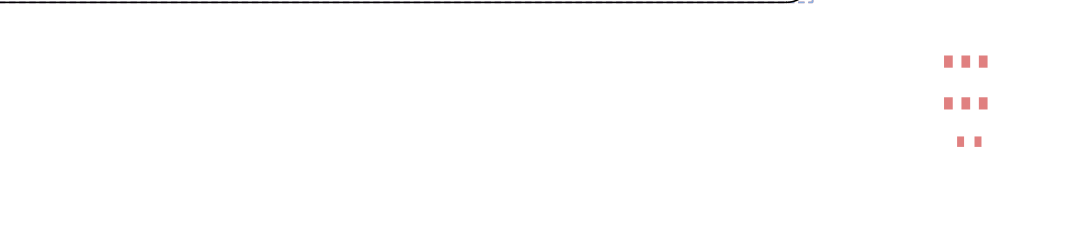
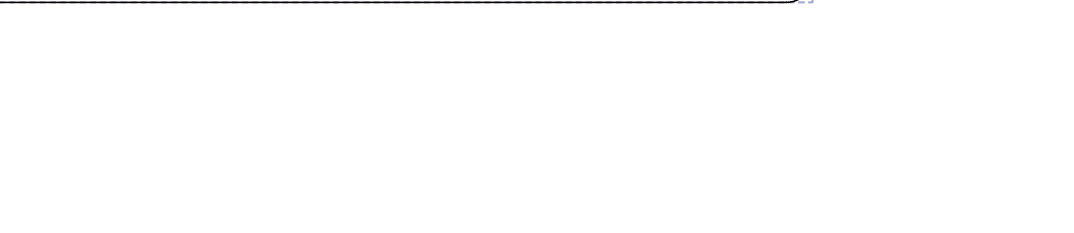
part: (965, 82) -> none
part: (969, 141) -> none

